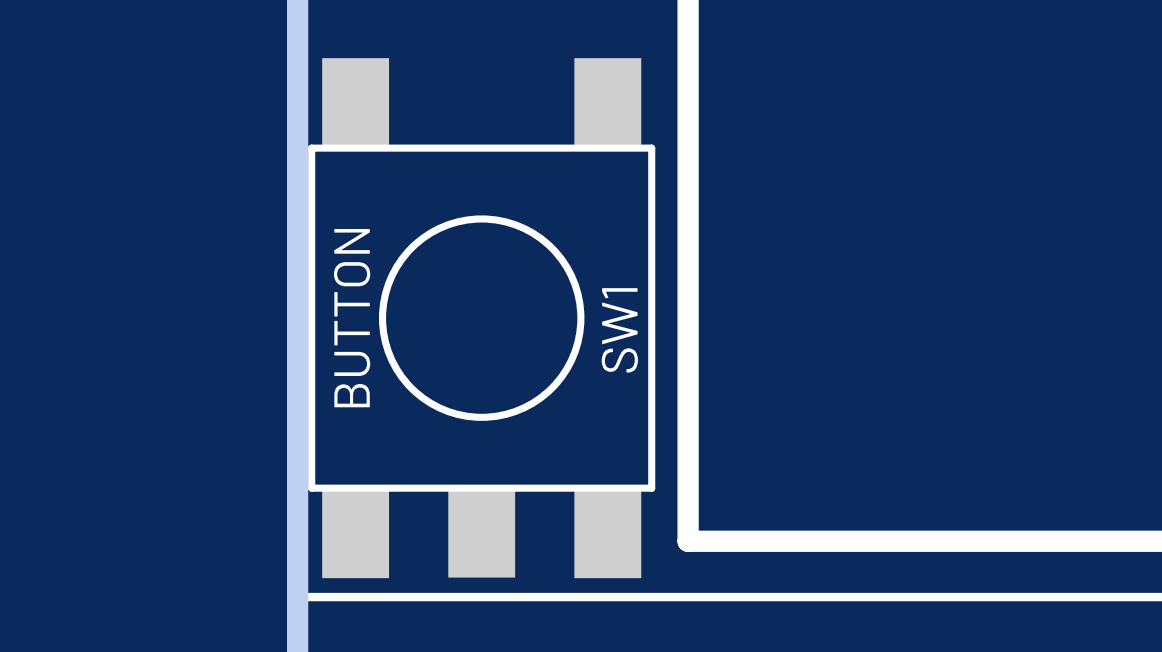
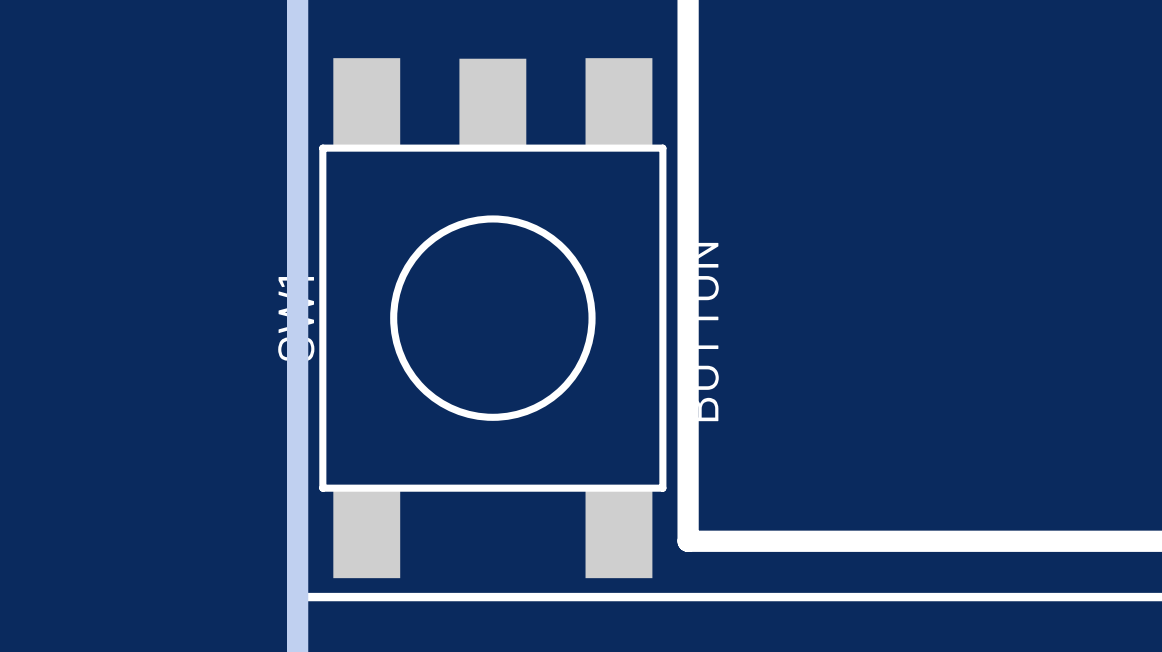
SW1 rotation: 0° (481, 318) -> 180° (492, 318)

